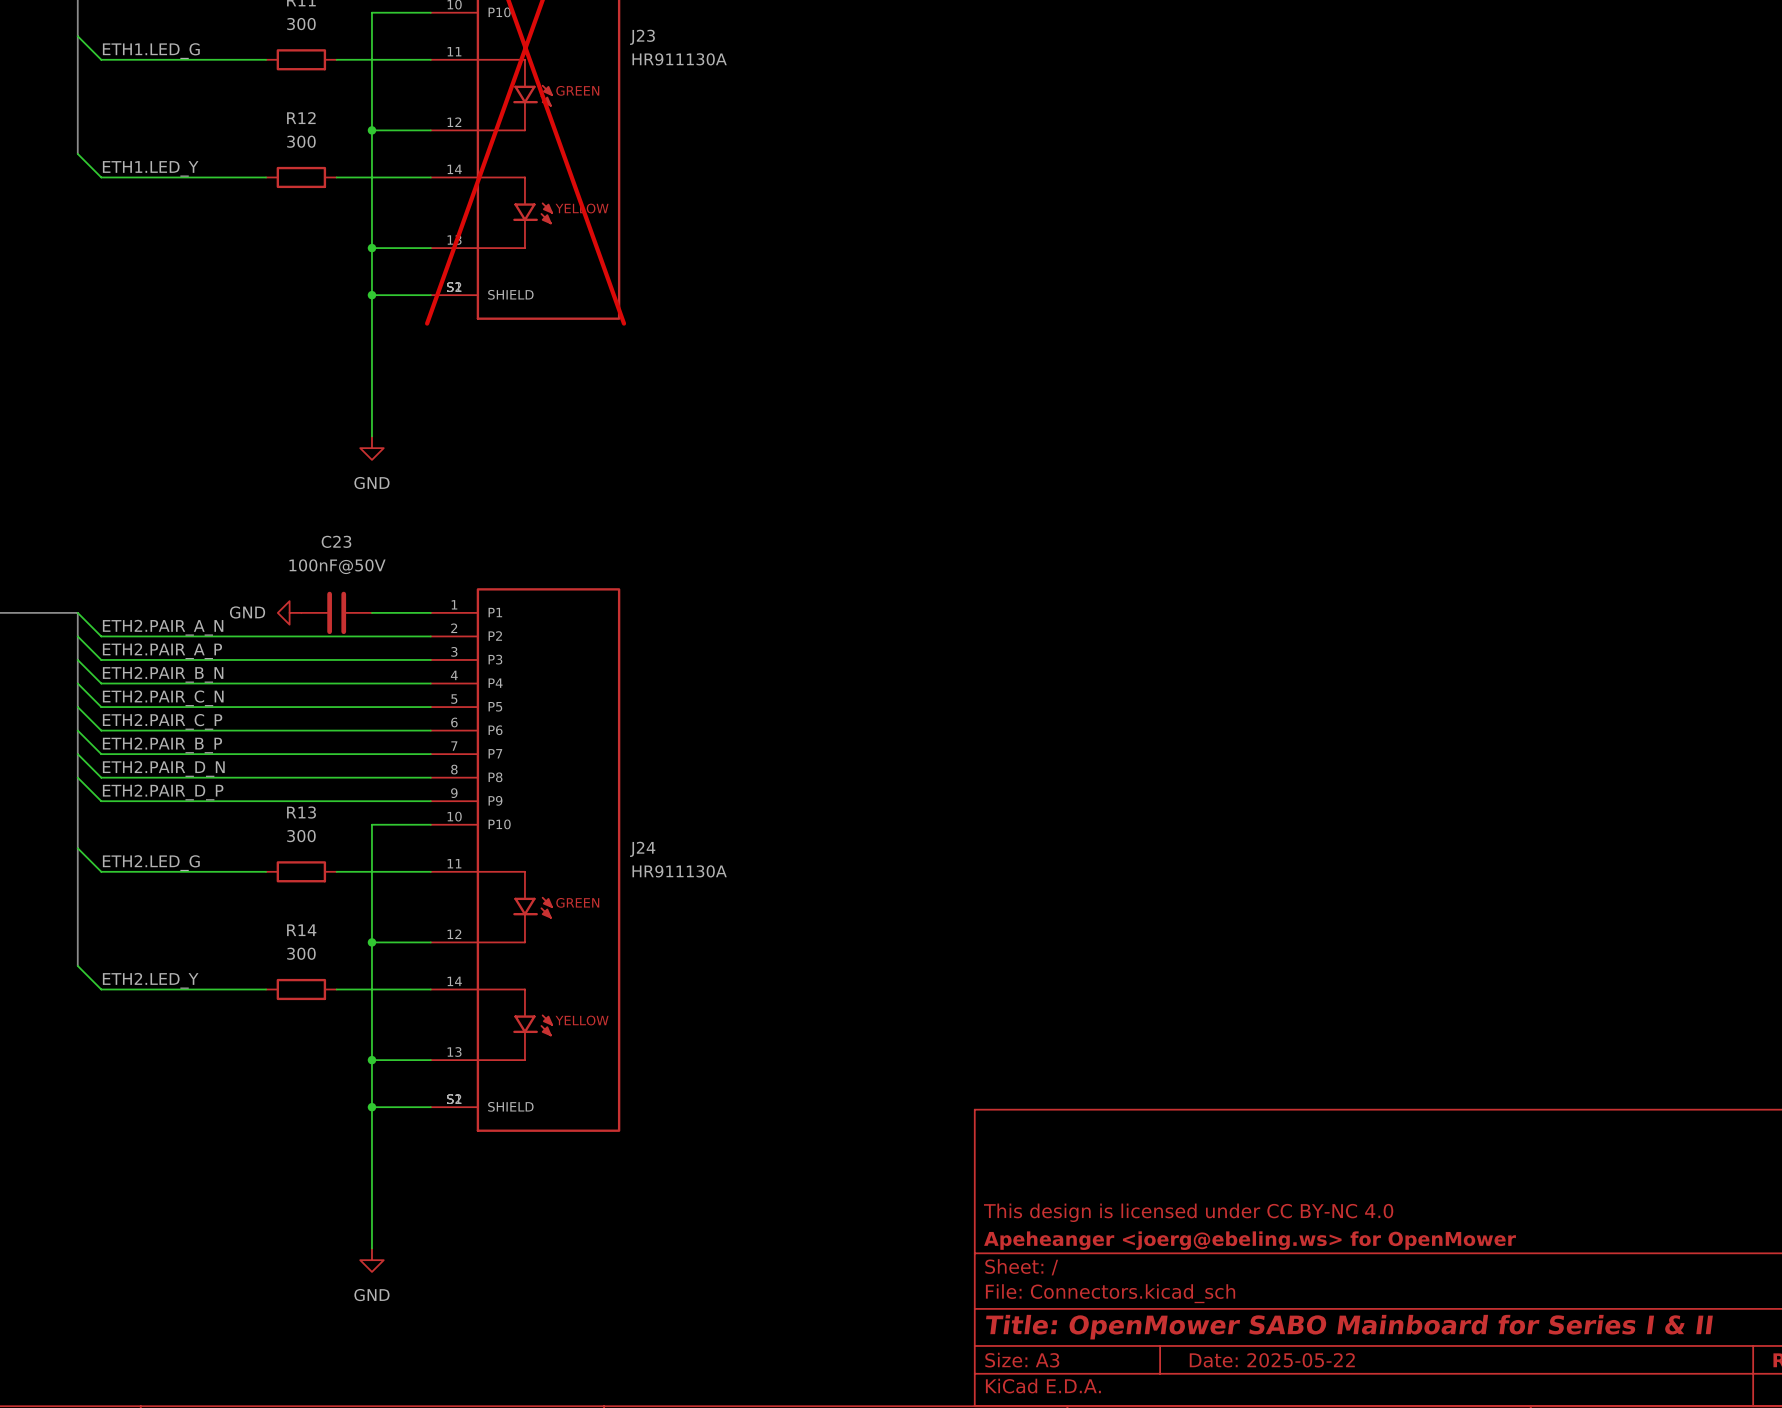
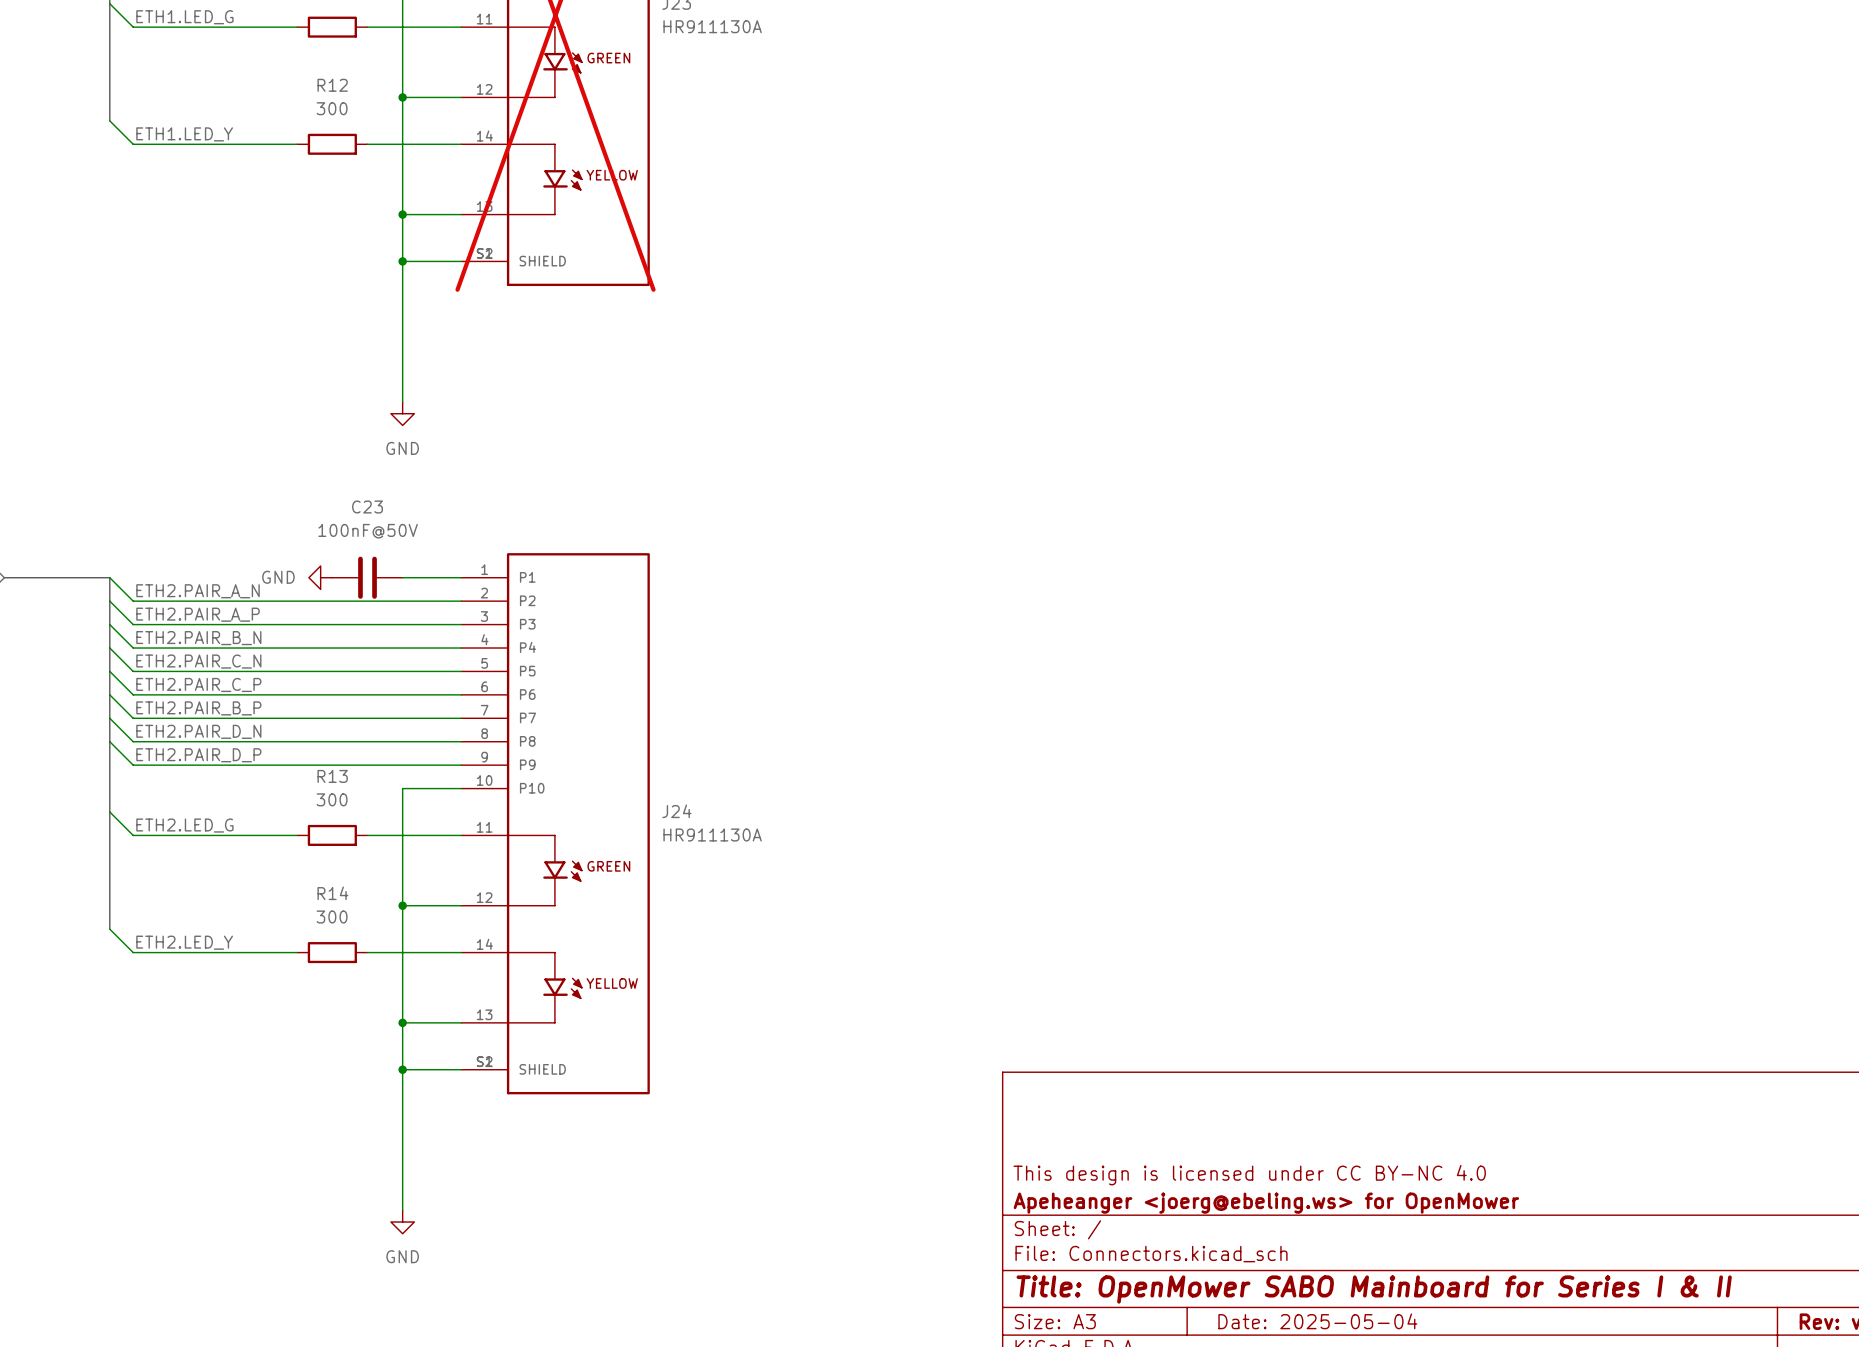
title block: Date: 2025-05-22 (1272, 1360) -> Date: 2025-05-04 (1317, 1321)

